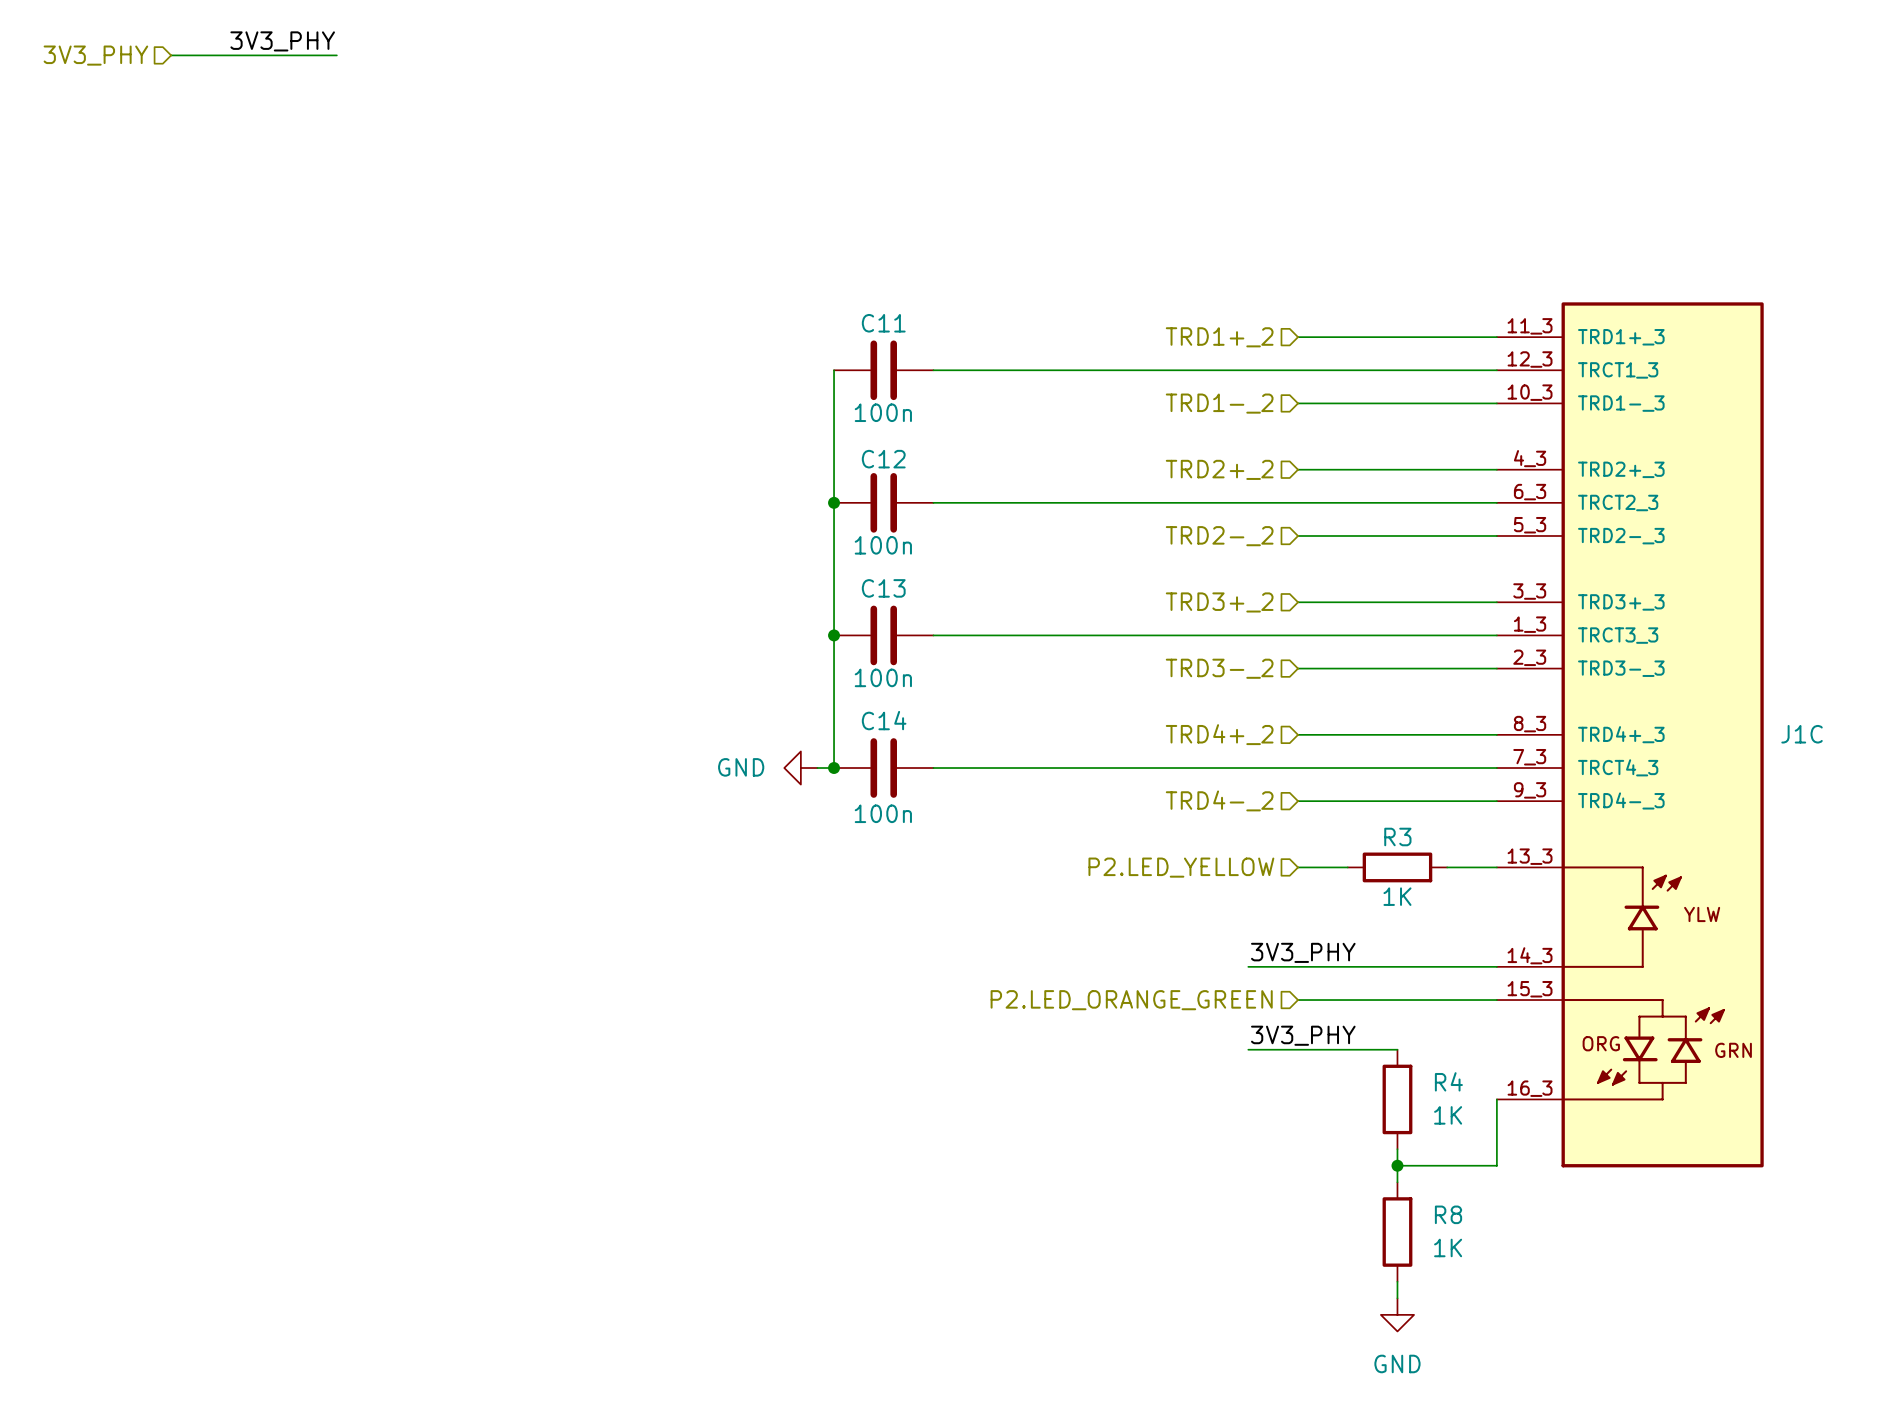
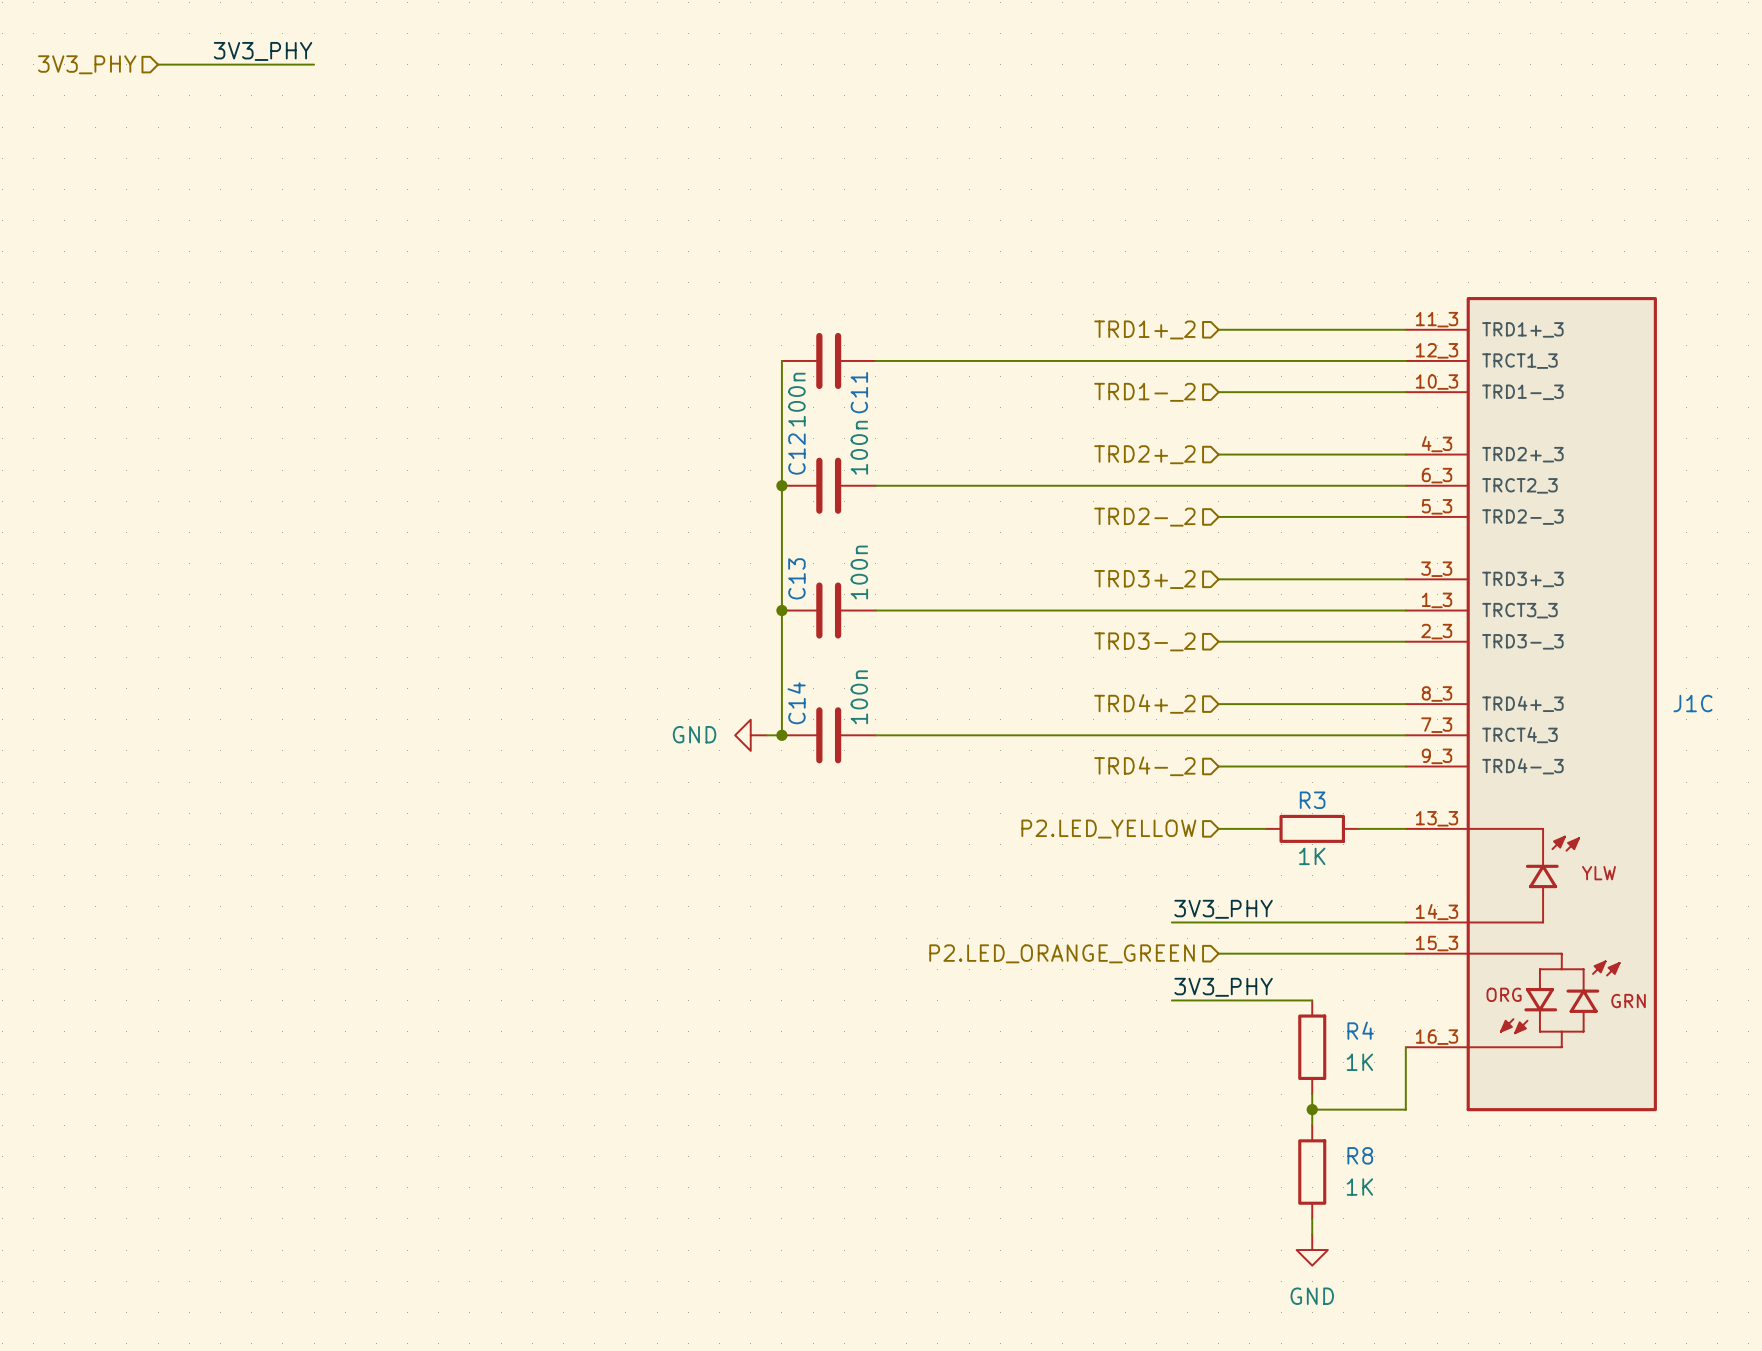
C11 name rotation: 0° (883, 323) -> 90° counterclockwise (859, 392)
C11 name position: C11 (883, 323) -> C11 (859, 392)
C11 value rotation: 0° (883, 412) -> 90° counterclockwise (796, 399)
C12 name rotation: 0° (883, 459) -> 90° counterclockwise (796, 454)
C12 value rotation: 0° (883, 545) -> 90° counterclockwise (859, 447)
C12 value position: 100n (883, 545) -> 100n (859, 447)
C13 name rotation: 0° (883, 588) -> 90° counterclockwise (796, 578)
C13 value rotation: 0° (883, 677) -> 90° counterclockwise (859, 572)
C13 value position: 100n (883, 677) -> 100n (859, 572)
C14 name rotation: 0° (884, 720) -> 90° counterclockwise (796, 703)
C14 value rotation: 0° (883, 813) -> 90° counterclockwise (859, 697)
C14 value position: 100n (883, 813) -> 100n (859, 697)

